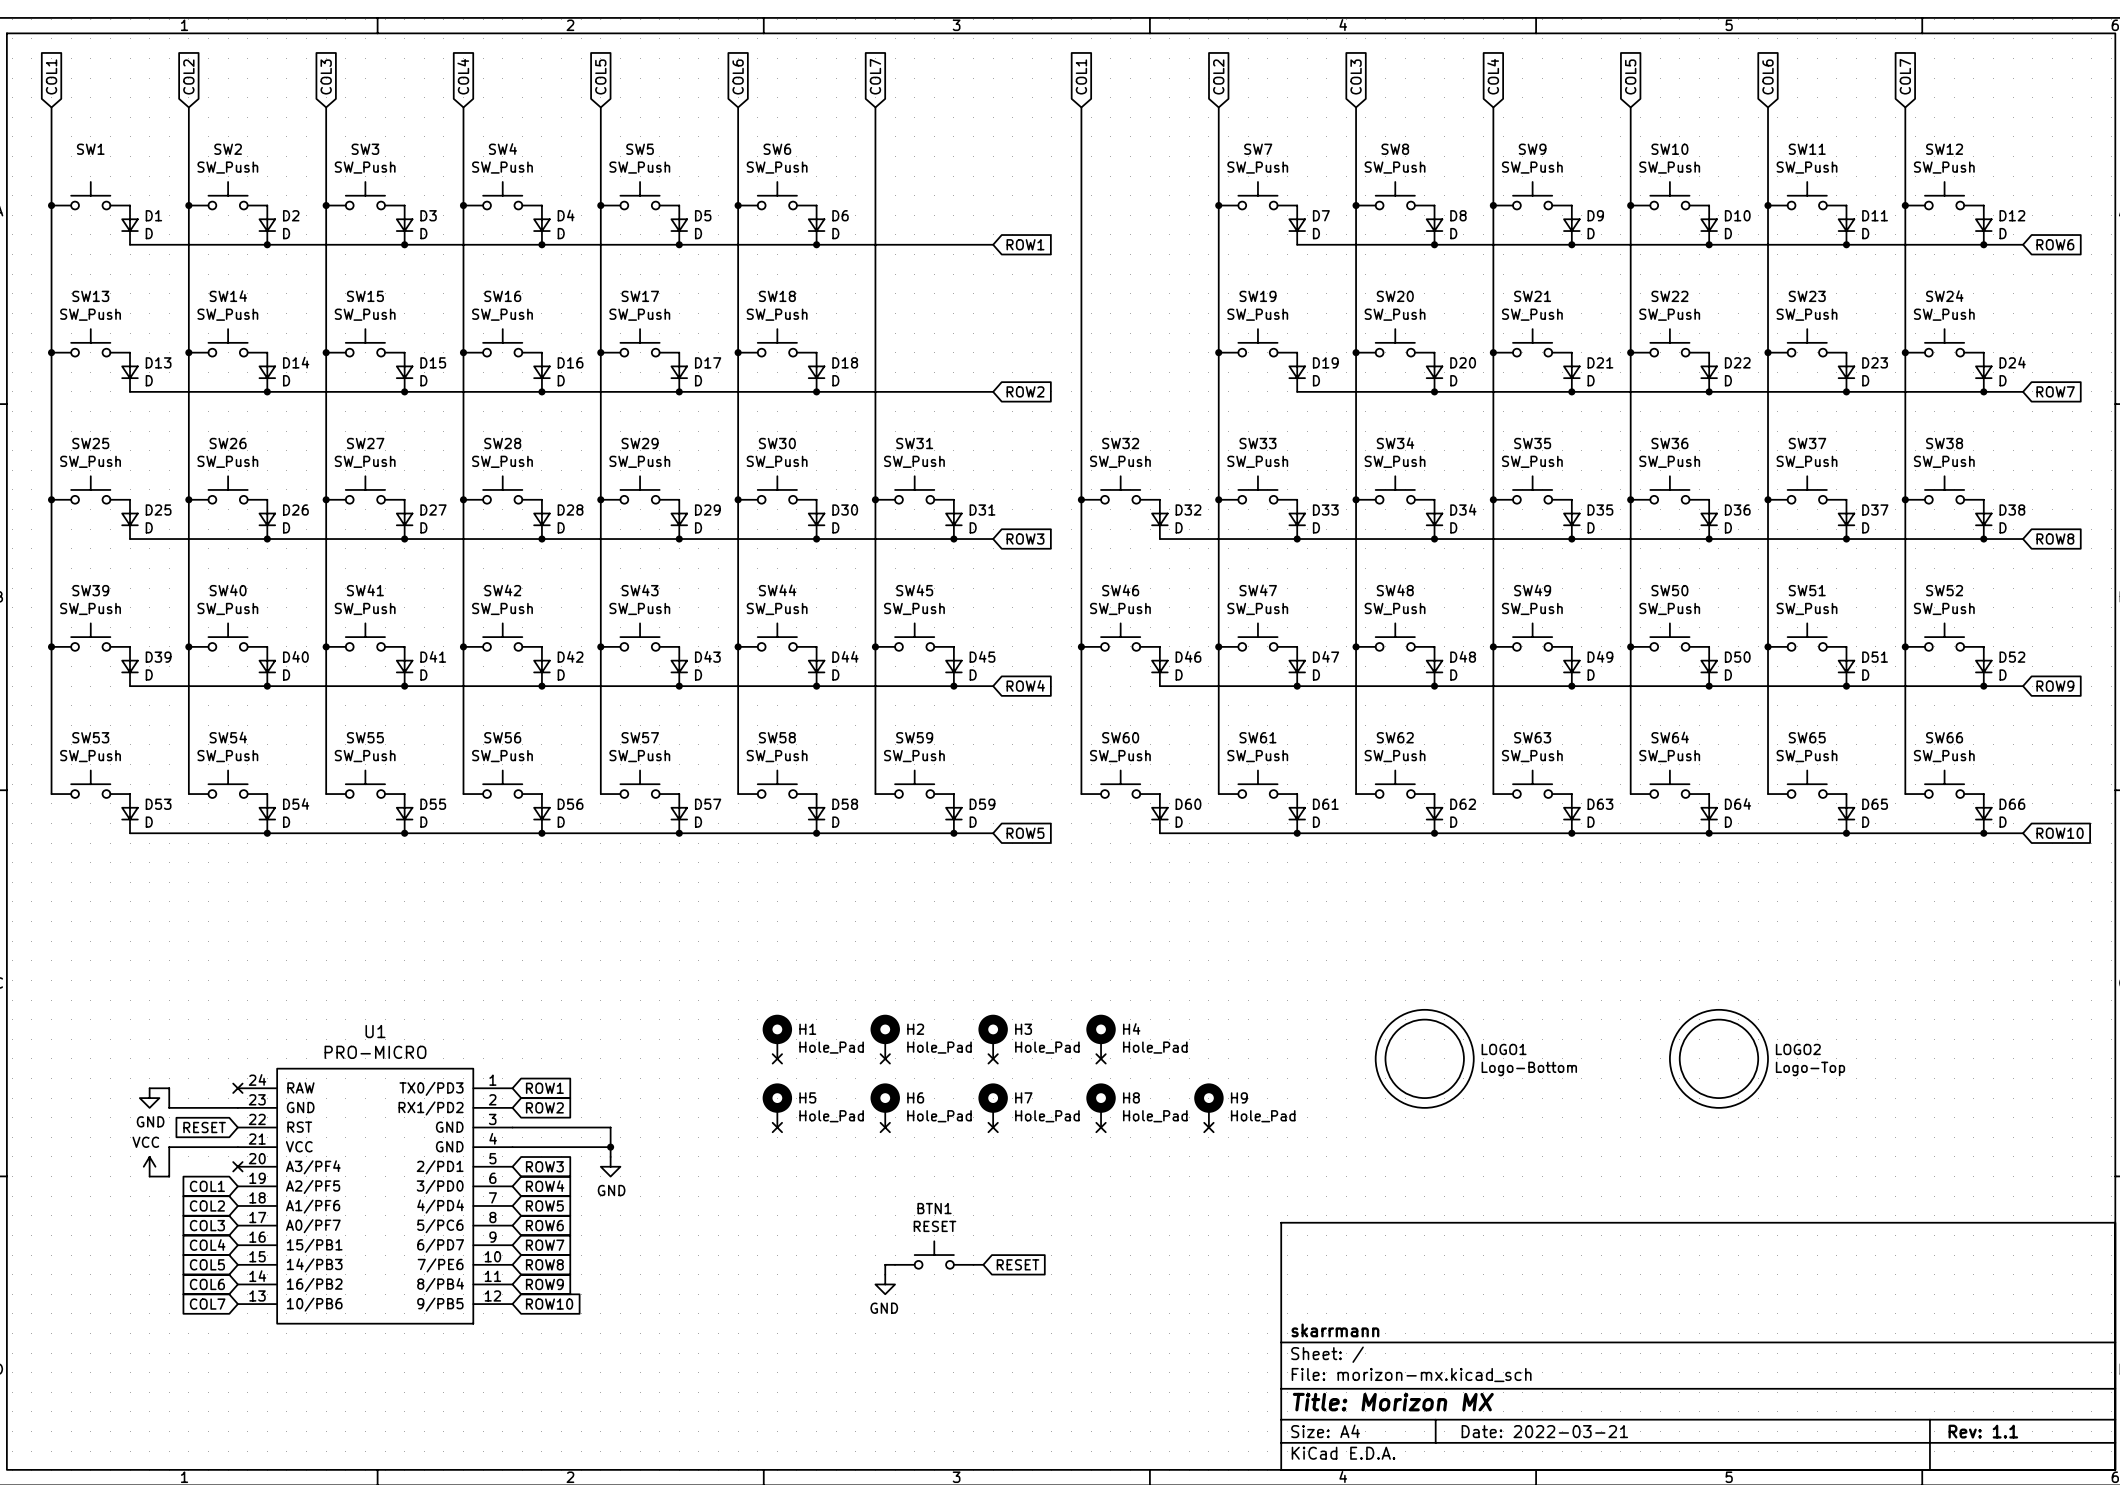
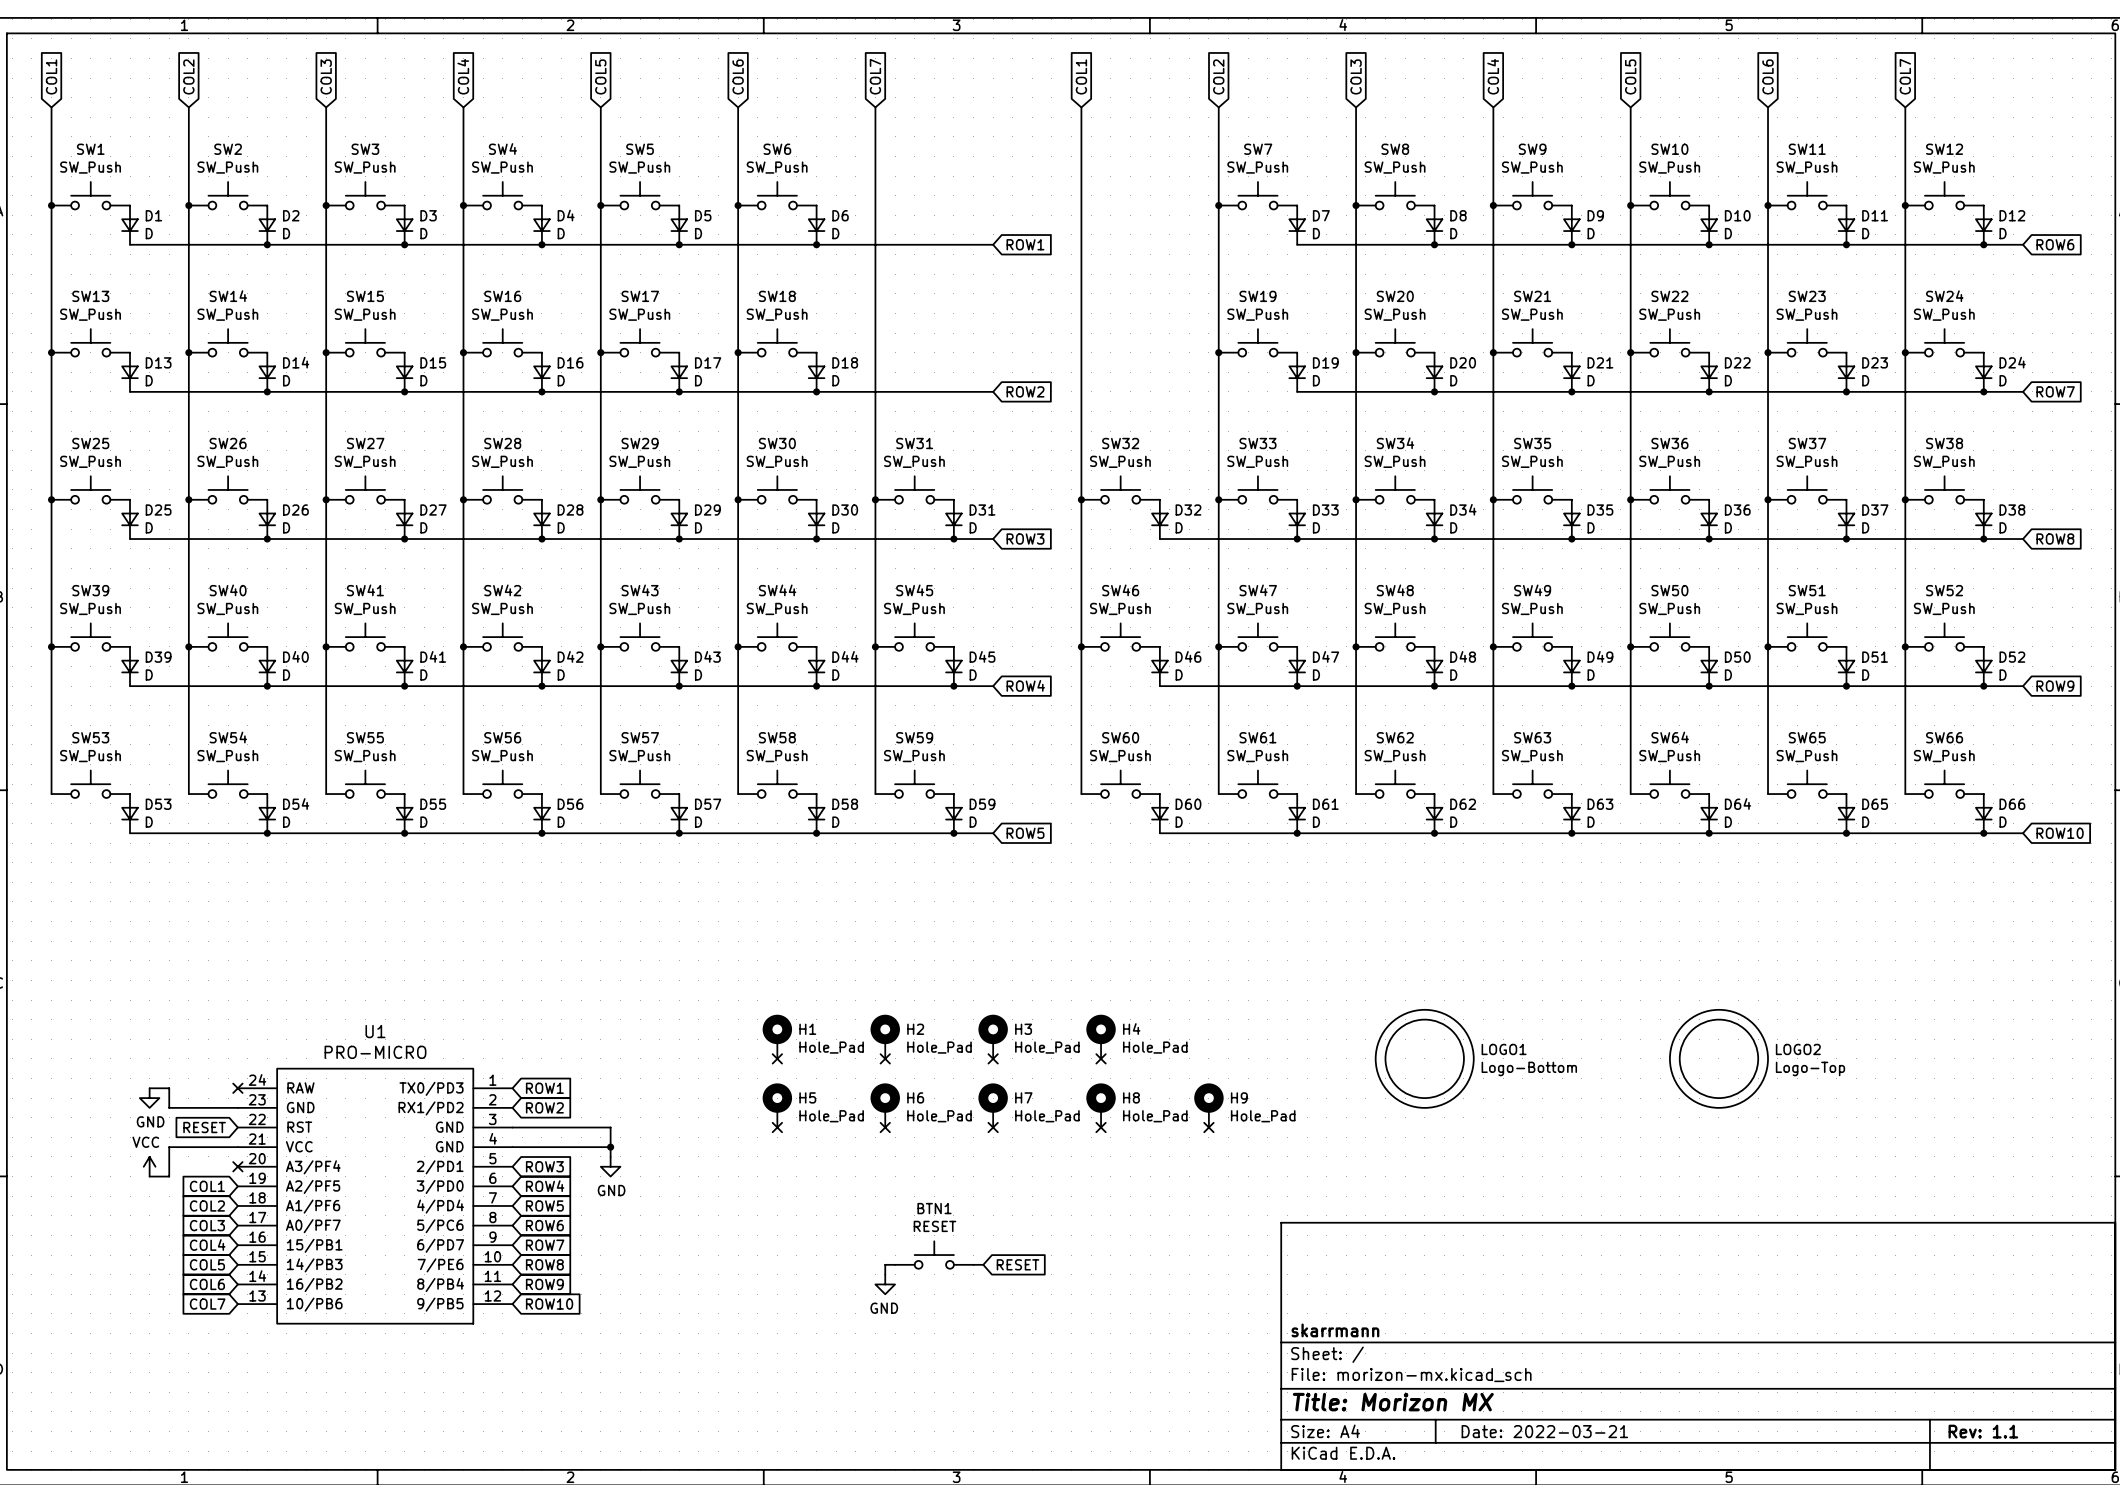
SW1 value: none -> SW_Push (90, 167)

